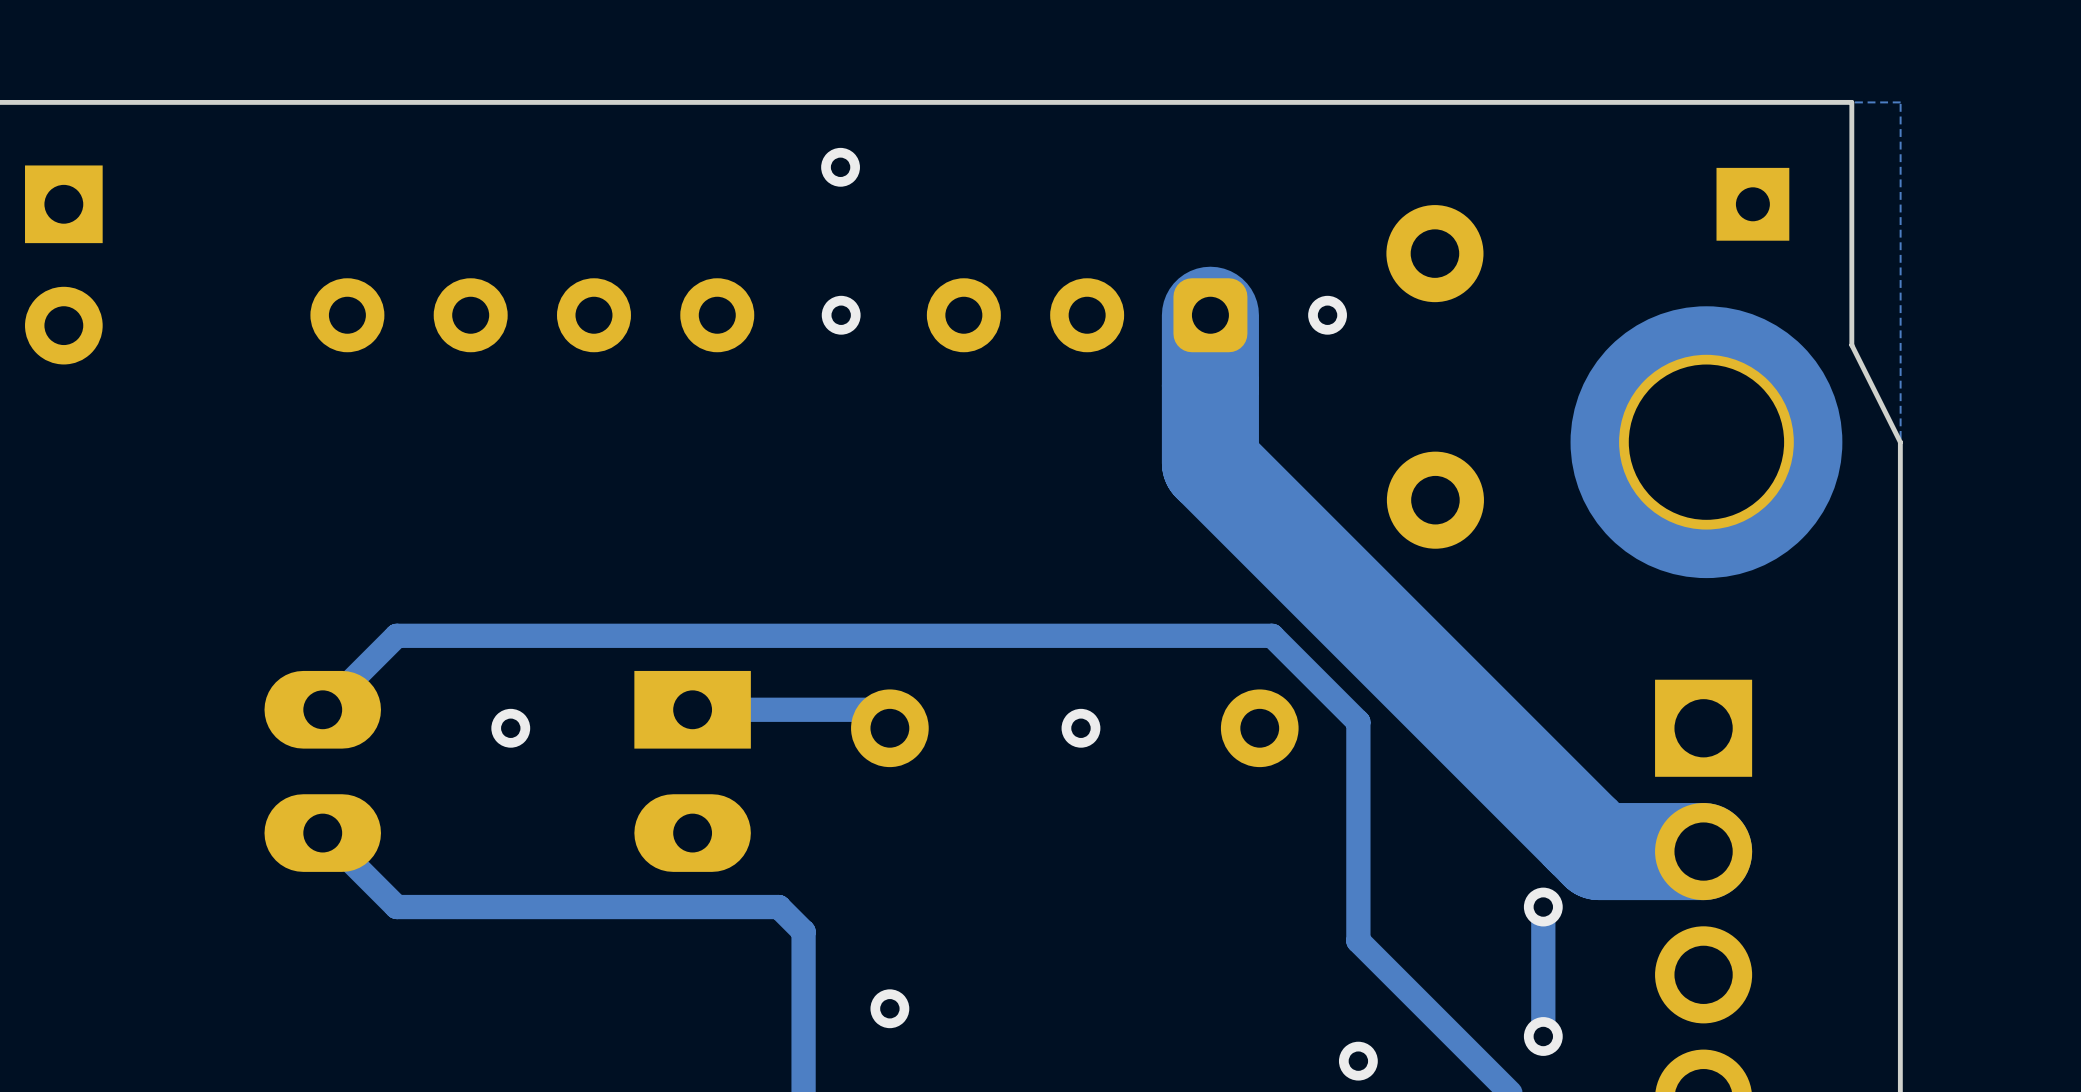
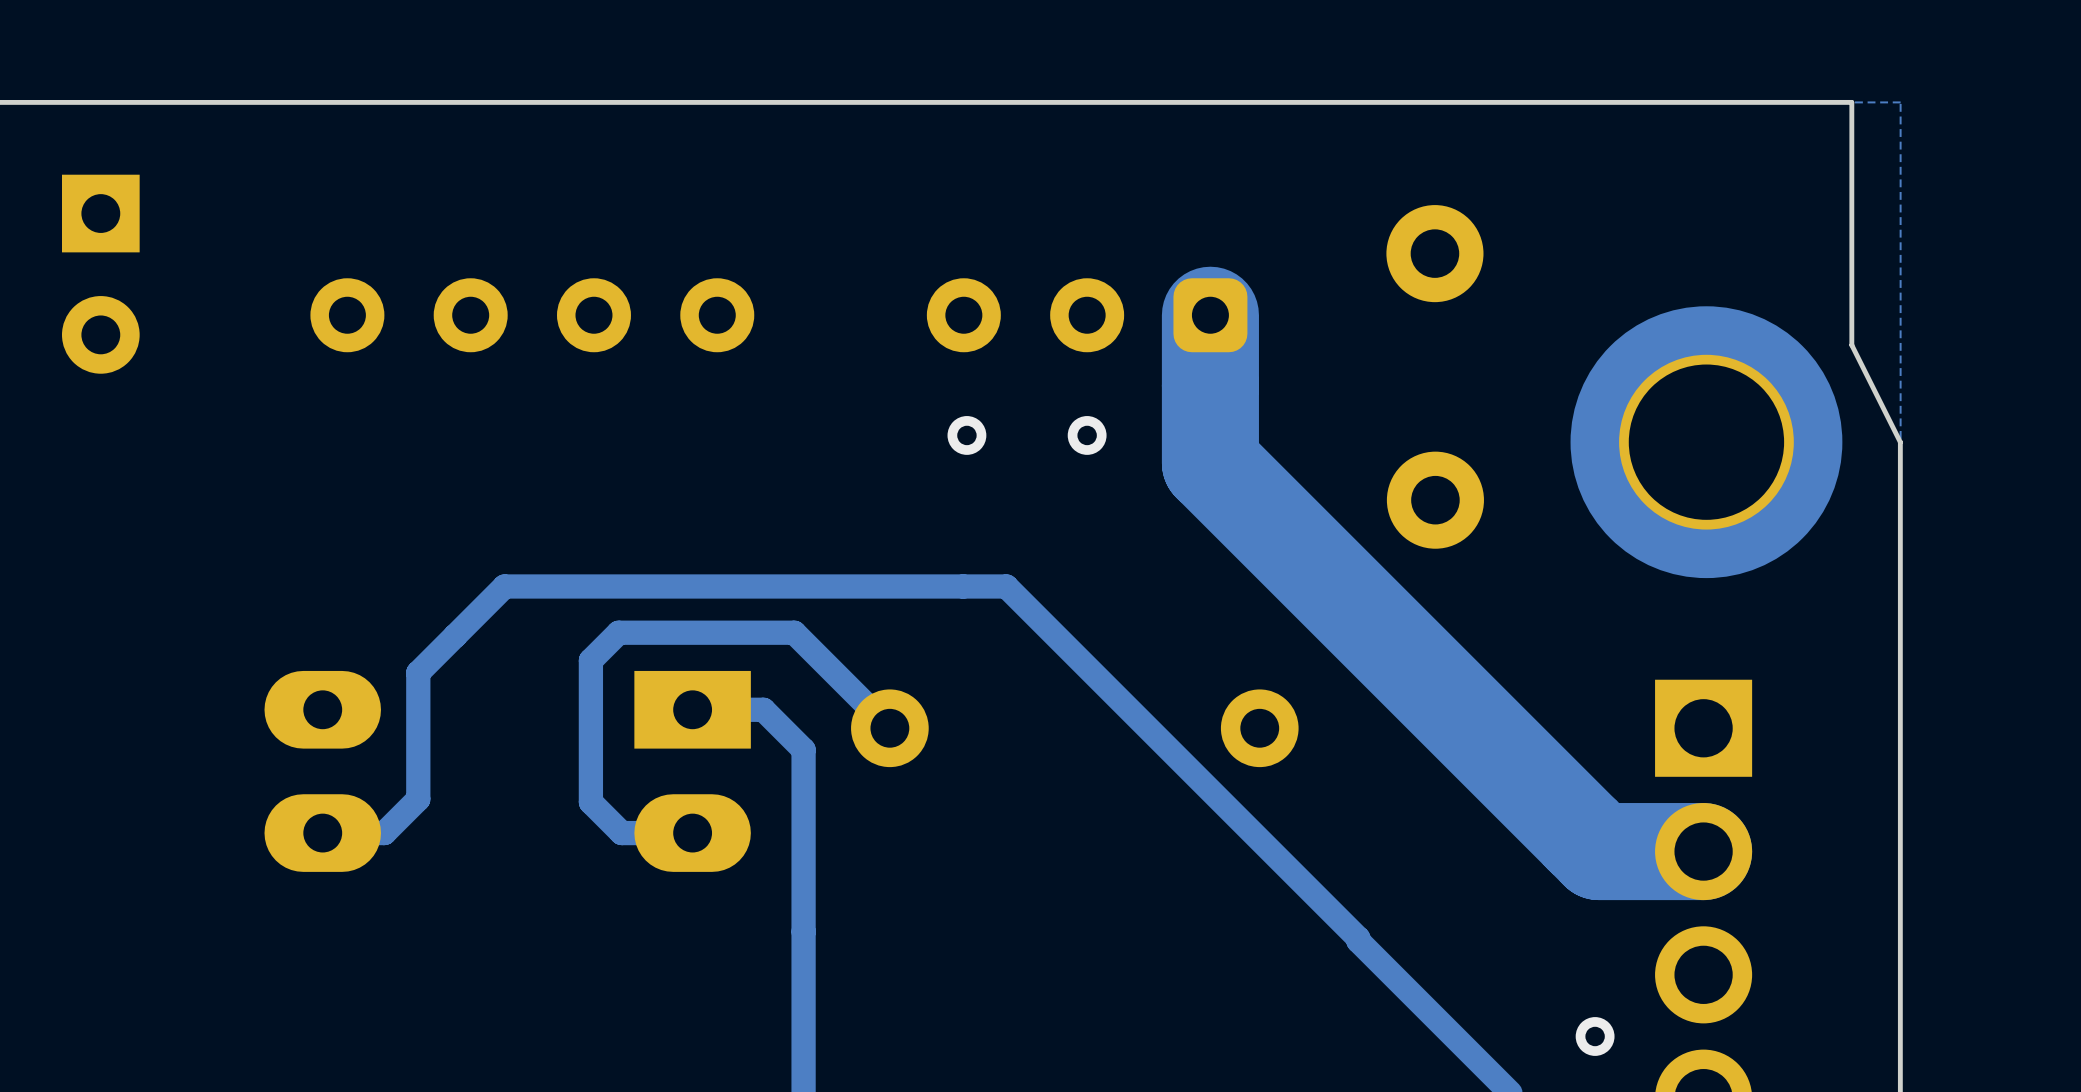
via: (840, 167) -> none
part: (1752, 204) -> none
part position: (63, 264) -> (100, 274)
via: (841, 315) -> none
via: (1327, 315) -> none
via: none -> (966, 435)
via: none -> (1087, 435)
track: (322, 709) (396, 635) (1272, 635) (1358, 722) (1358, 938) -> (322, 833) (384, 833) (418, 799) (418, 672) (504, 586) (1006, 586) (1358, 938)
track: (871, 709) (763, 709) -> (871, 709) (794, 632) (618, 632) (590, 660) (590, 802) (621, 833) (692, 833)
via: (510, 728) -> none
via: (1080, 728) -> none
track: (322, 833) (396, 907) (778, 907) (803, 931) -> (763, 709) (803, 749) (803, 931)
track: (1543, 907) (1543, 1036) -> none
via: (1543, 907) -> none
via: (889, 1008) -> none
via position: (1543, 1036) -> (1595, 1036)
via: (1358, 1061) -> none

